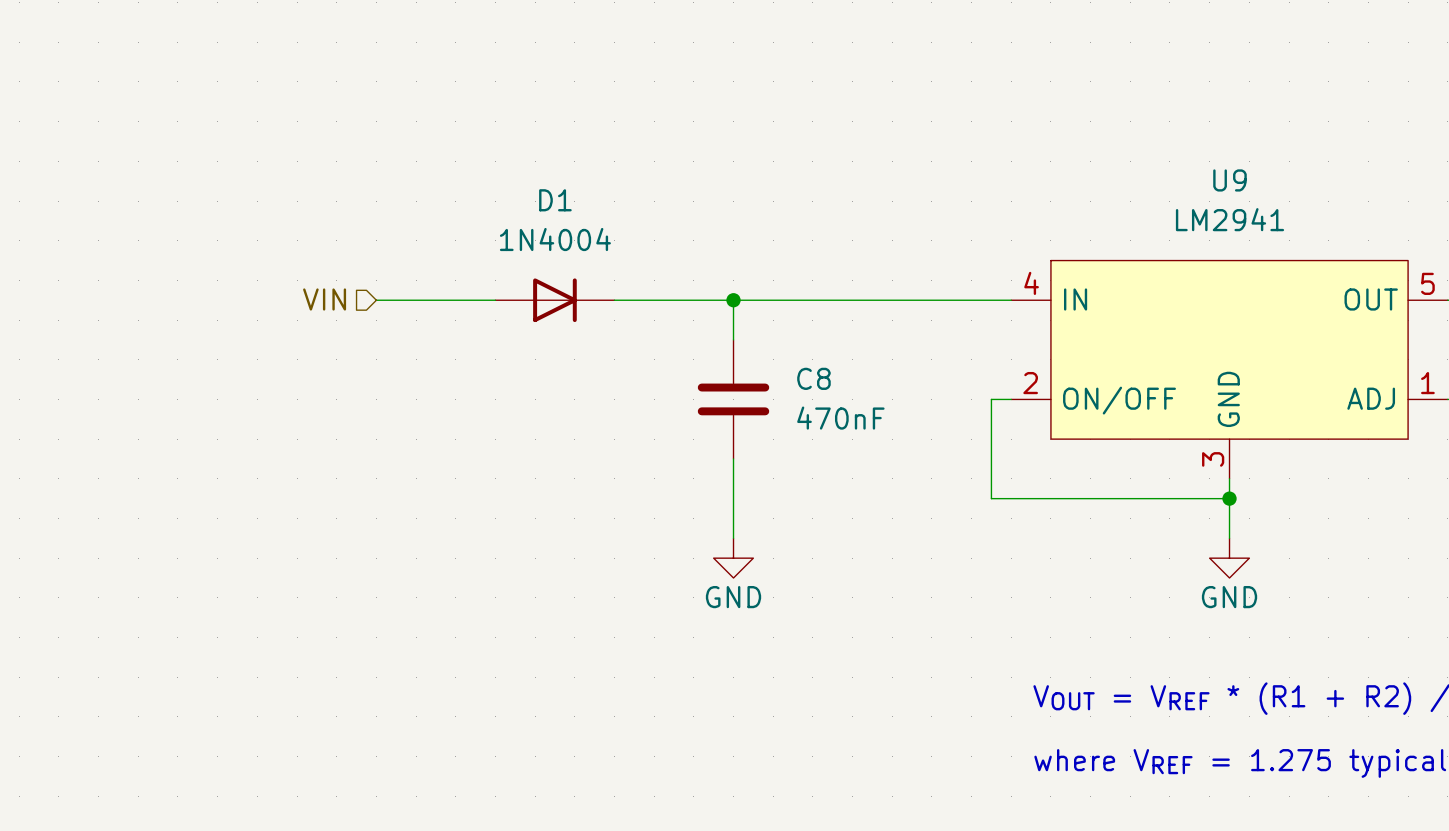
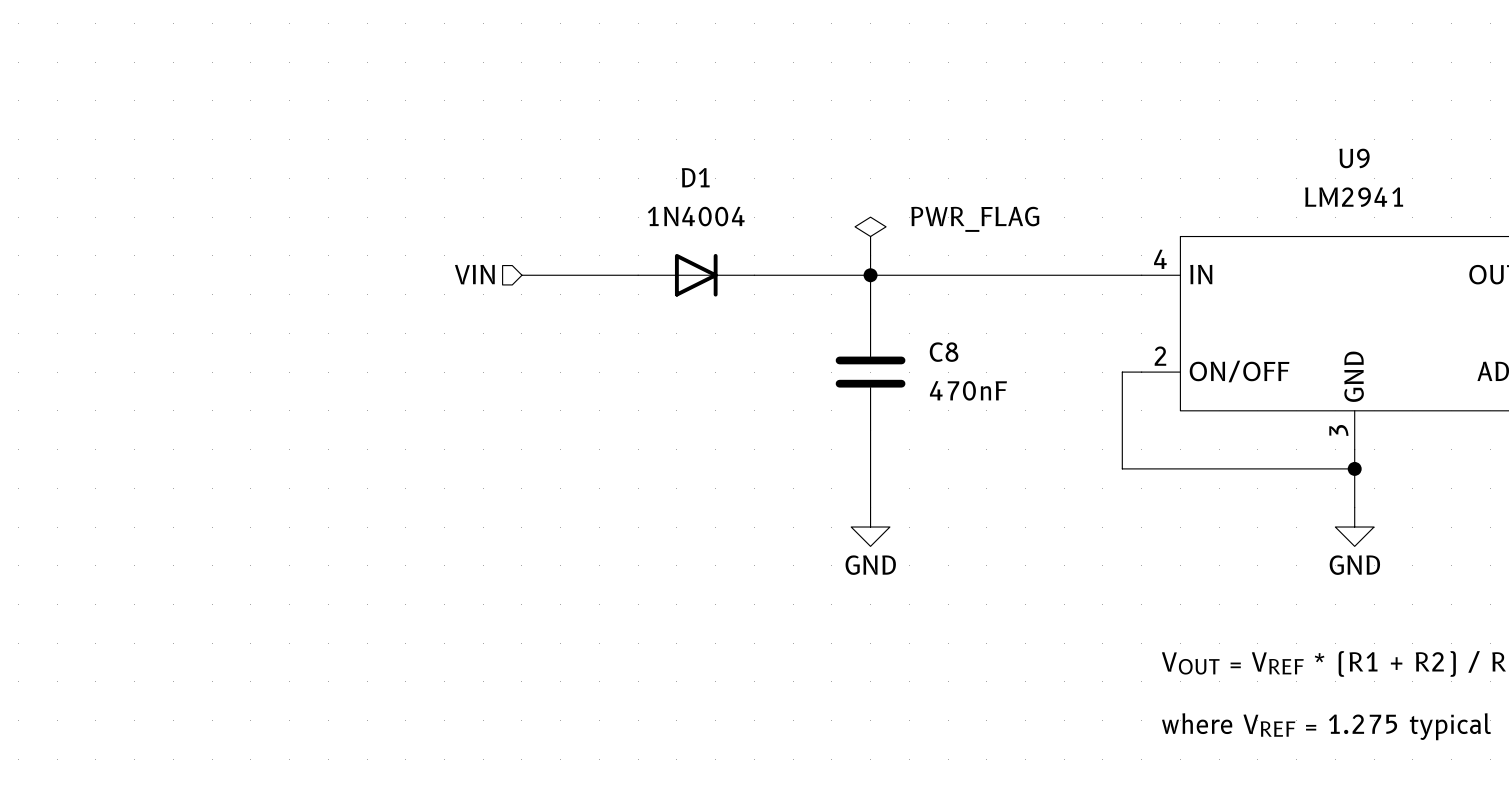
power symbol: none -> PWR_FLAG (870, 236)
wire: none -> (870, 255) (870, 275)

